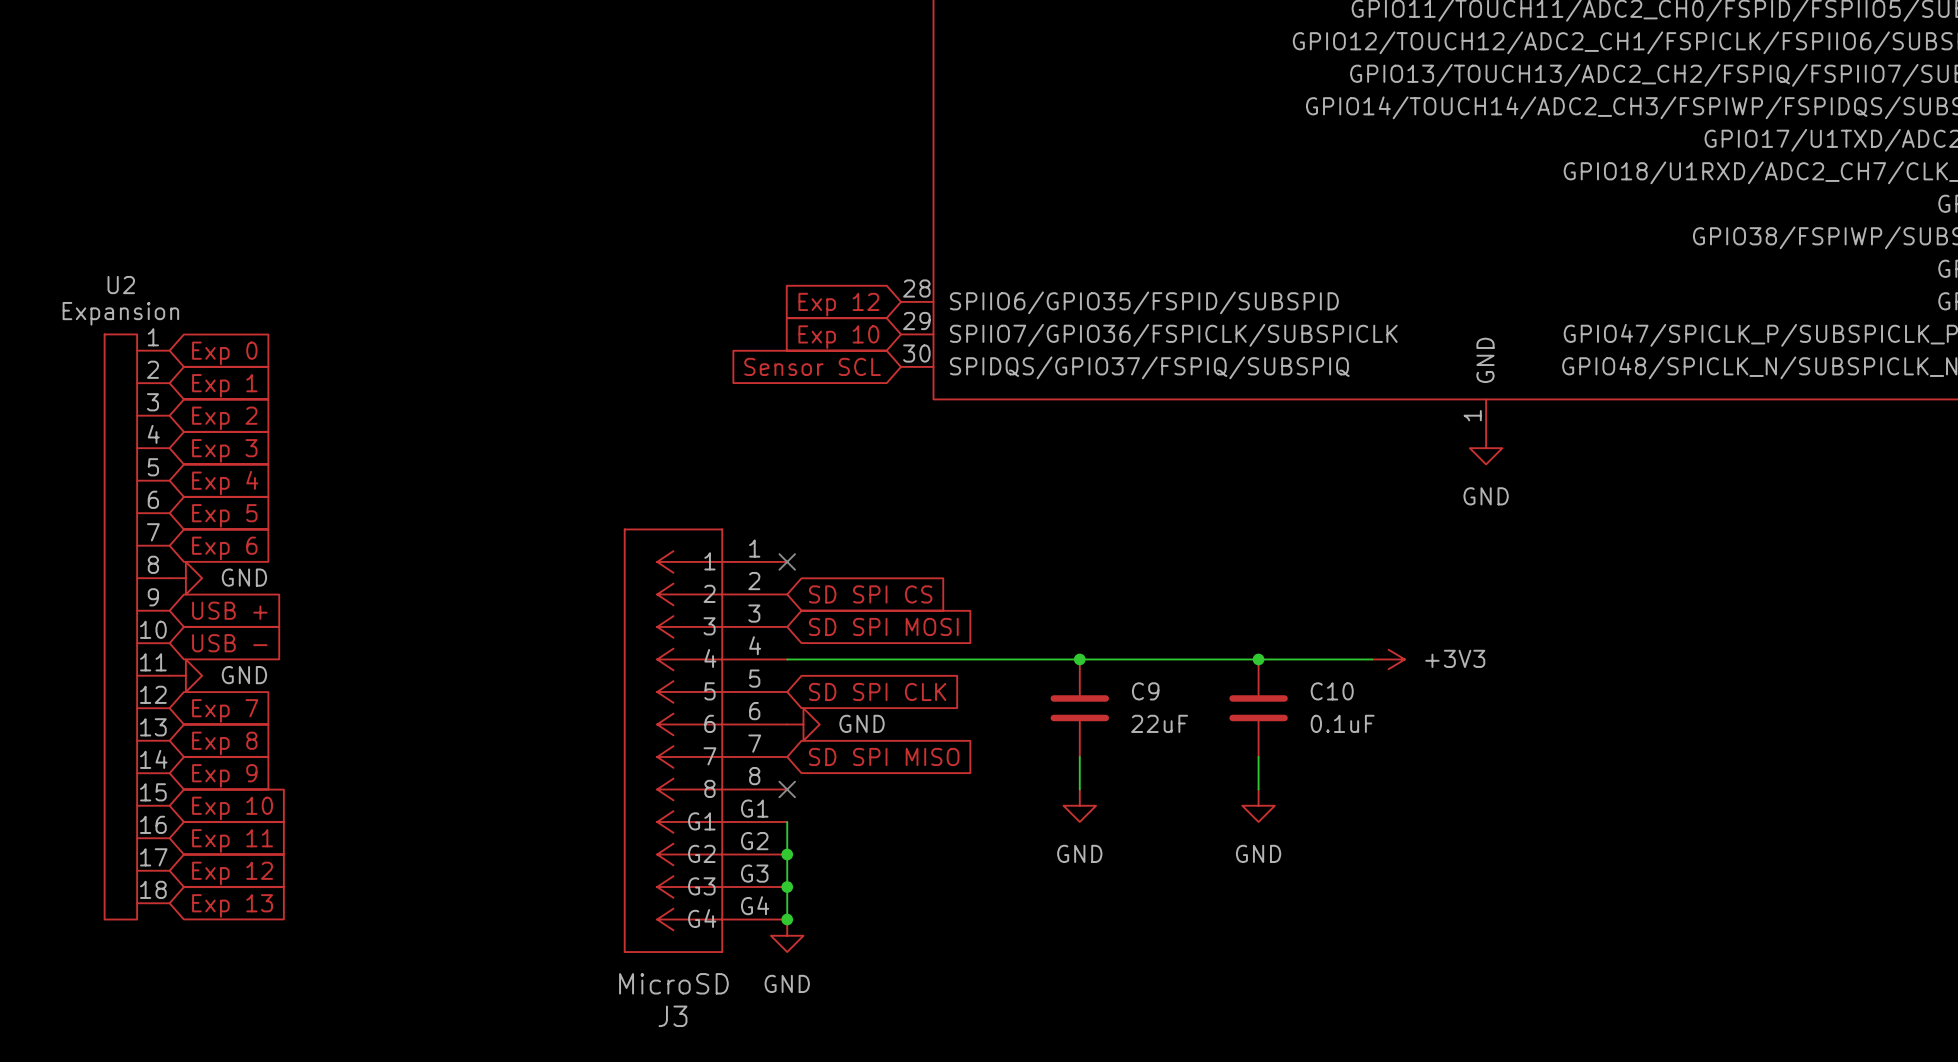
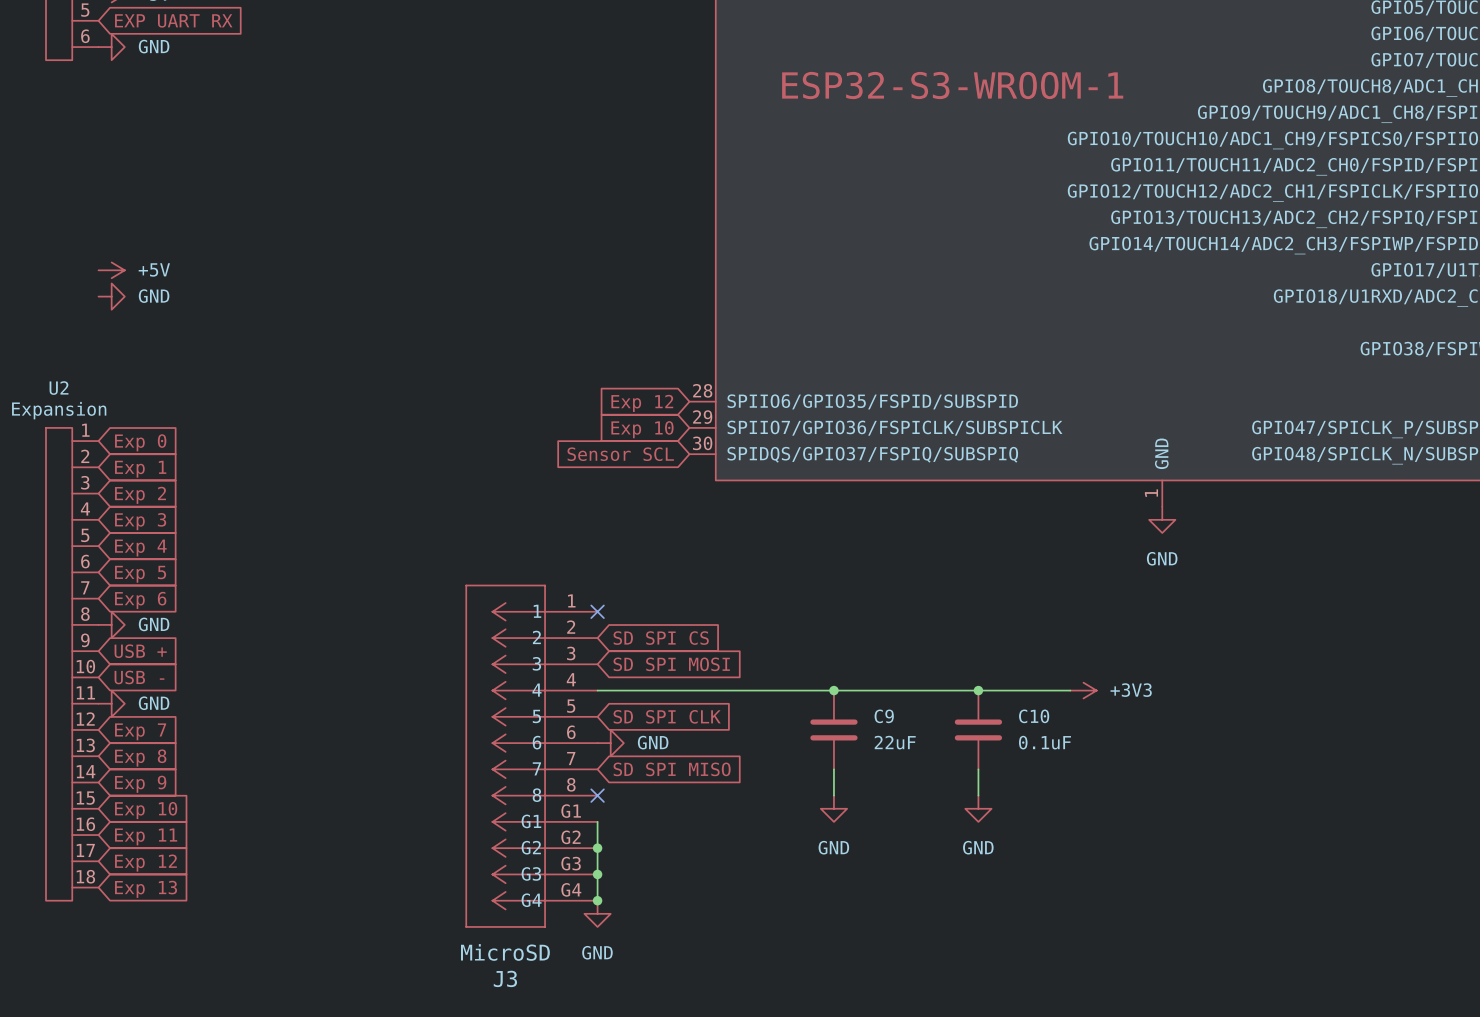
power symbol: none -> +5V (111, 270)
power symbol: none -> GND (111, 296)

